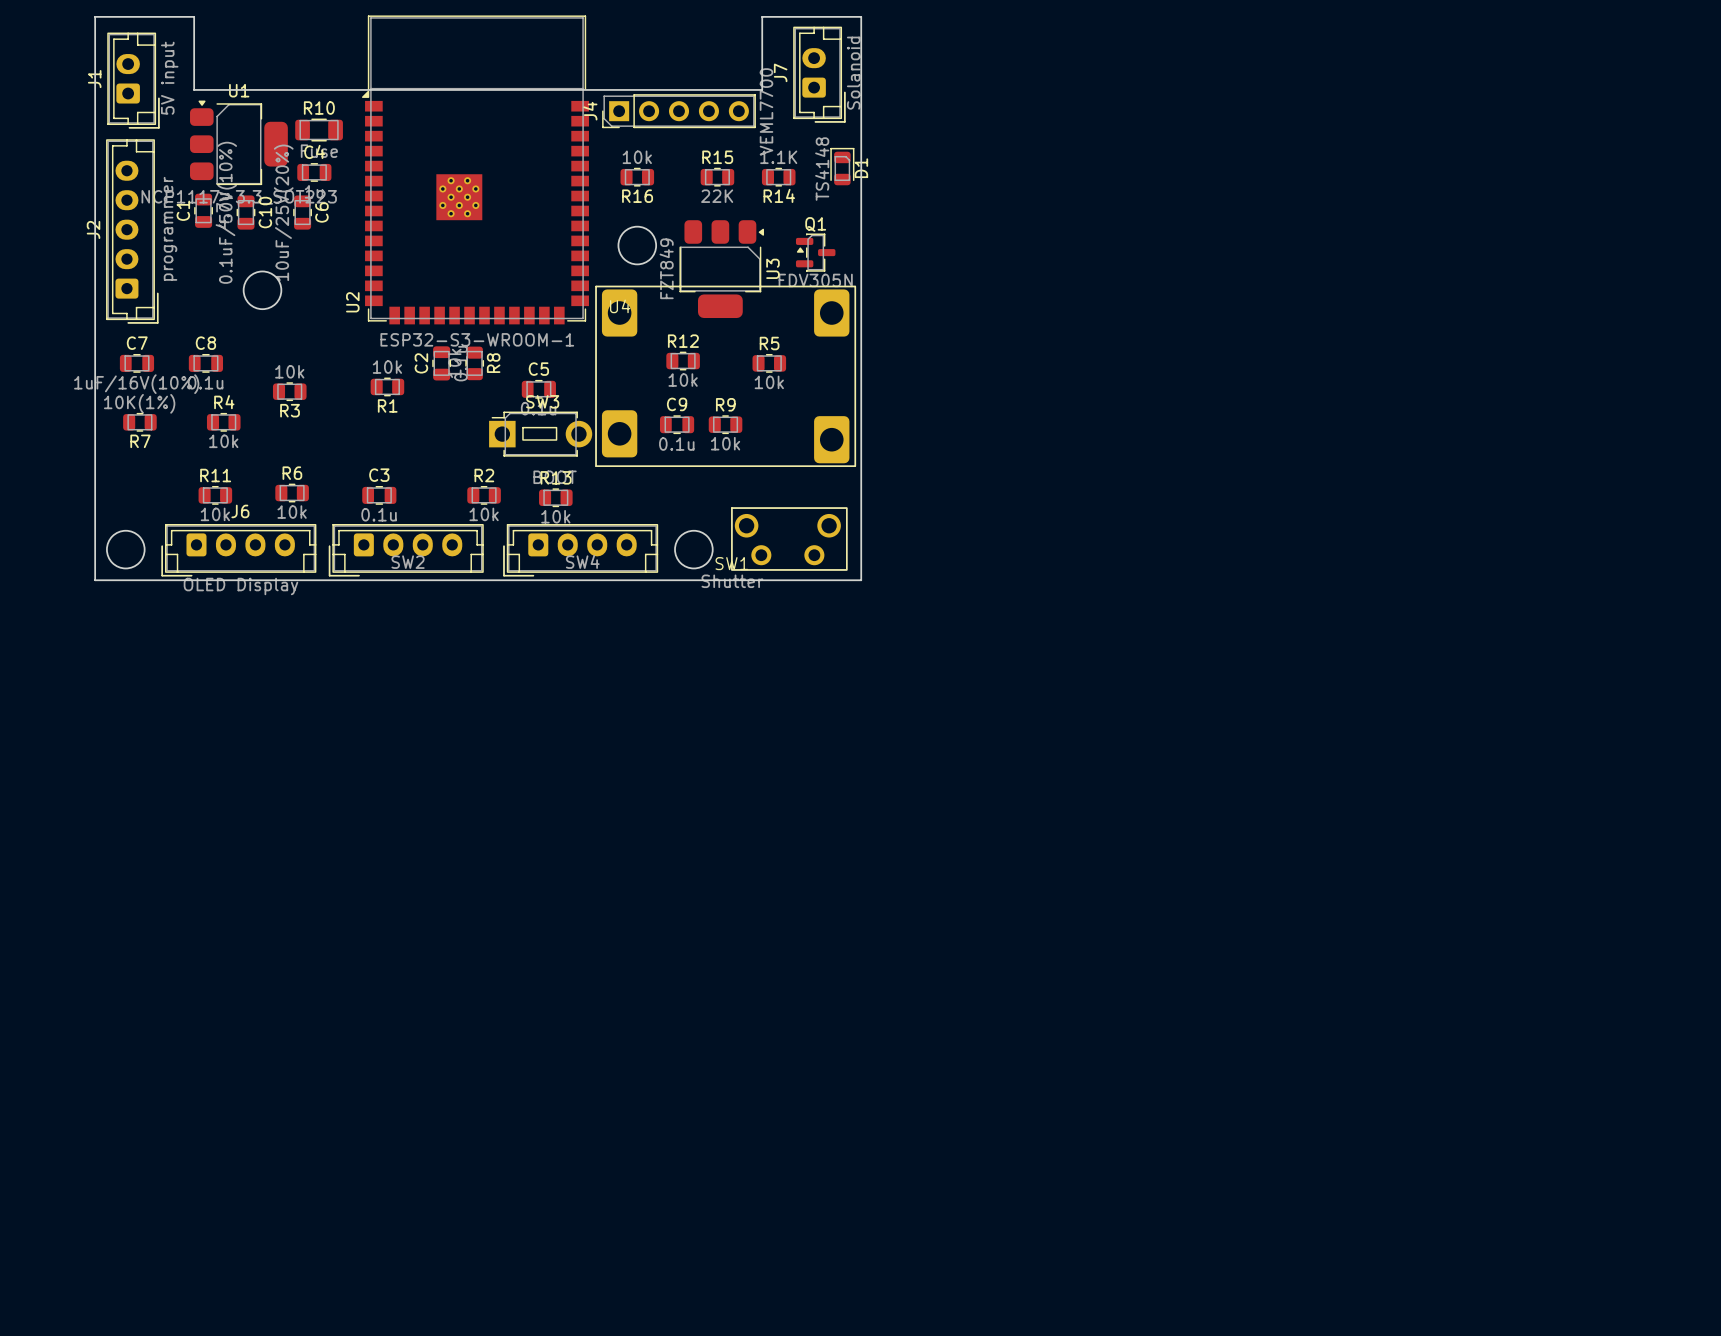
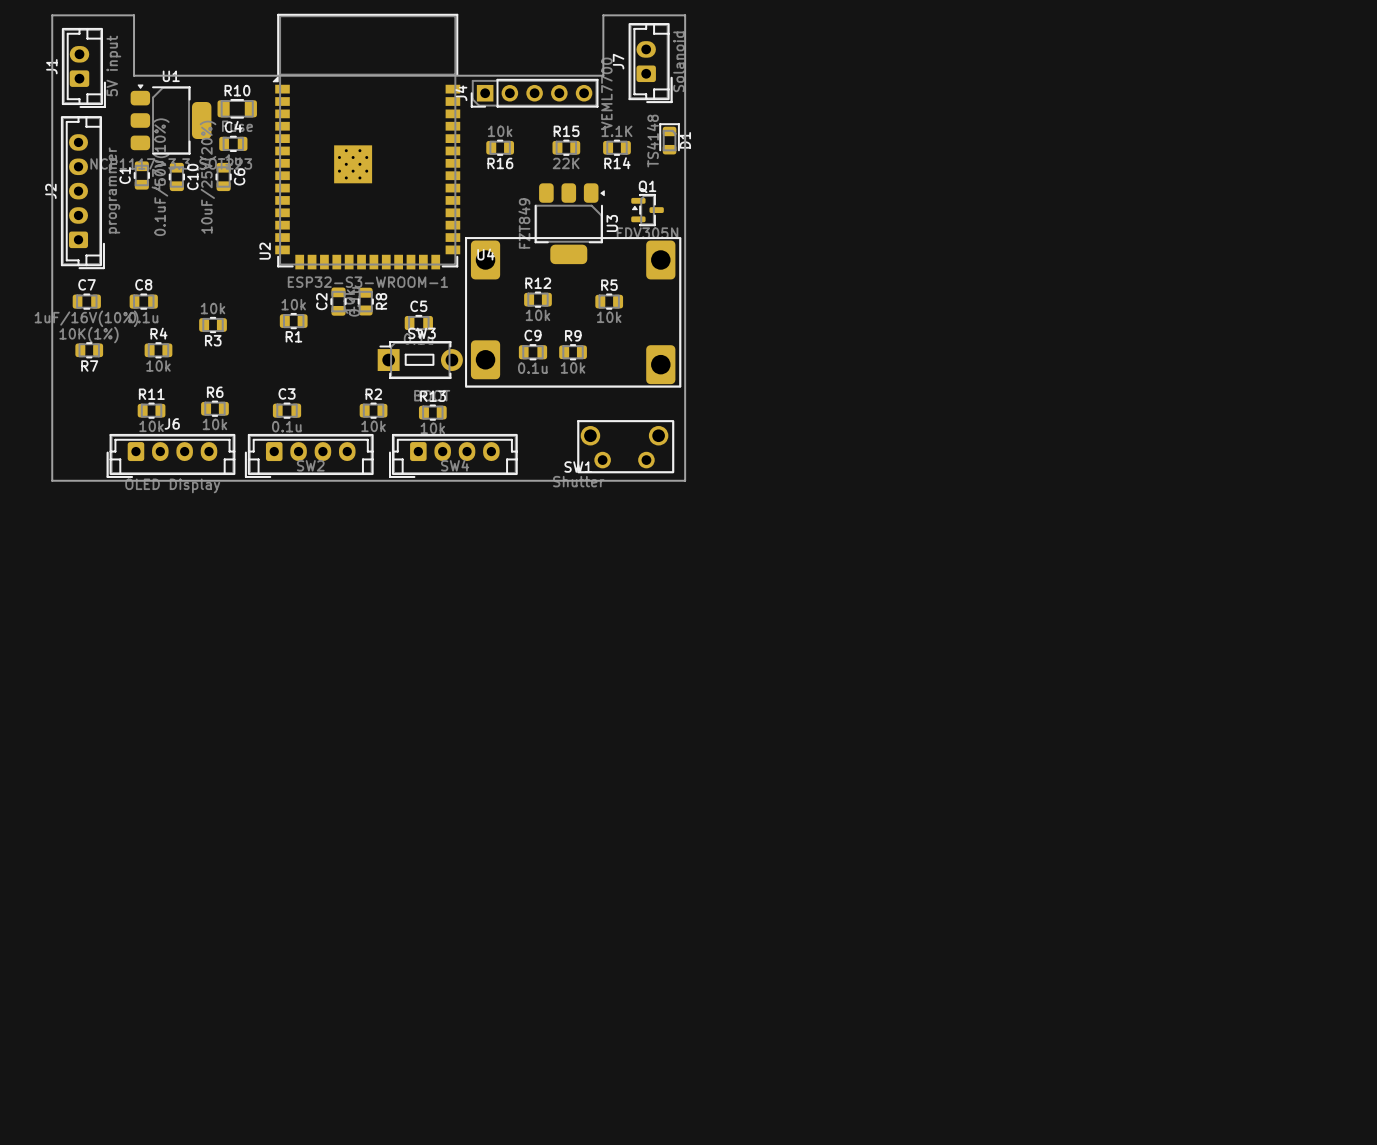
round board edge: [617, 225, 658, 266] -> none
round board edge: [242, 270, 283, 311] -> none
round board edge: [106, 529, 146, 570] -> none
round board edge: [674, 529, 714, 570] -> none

